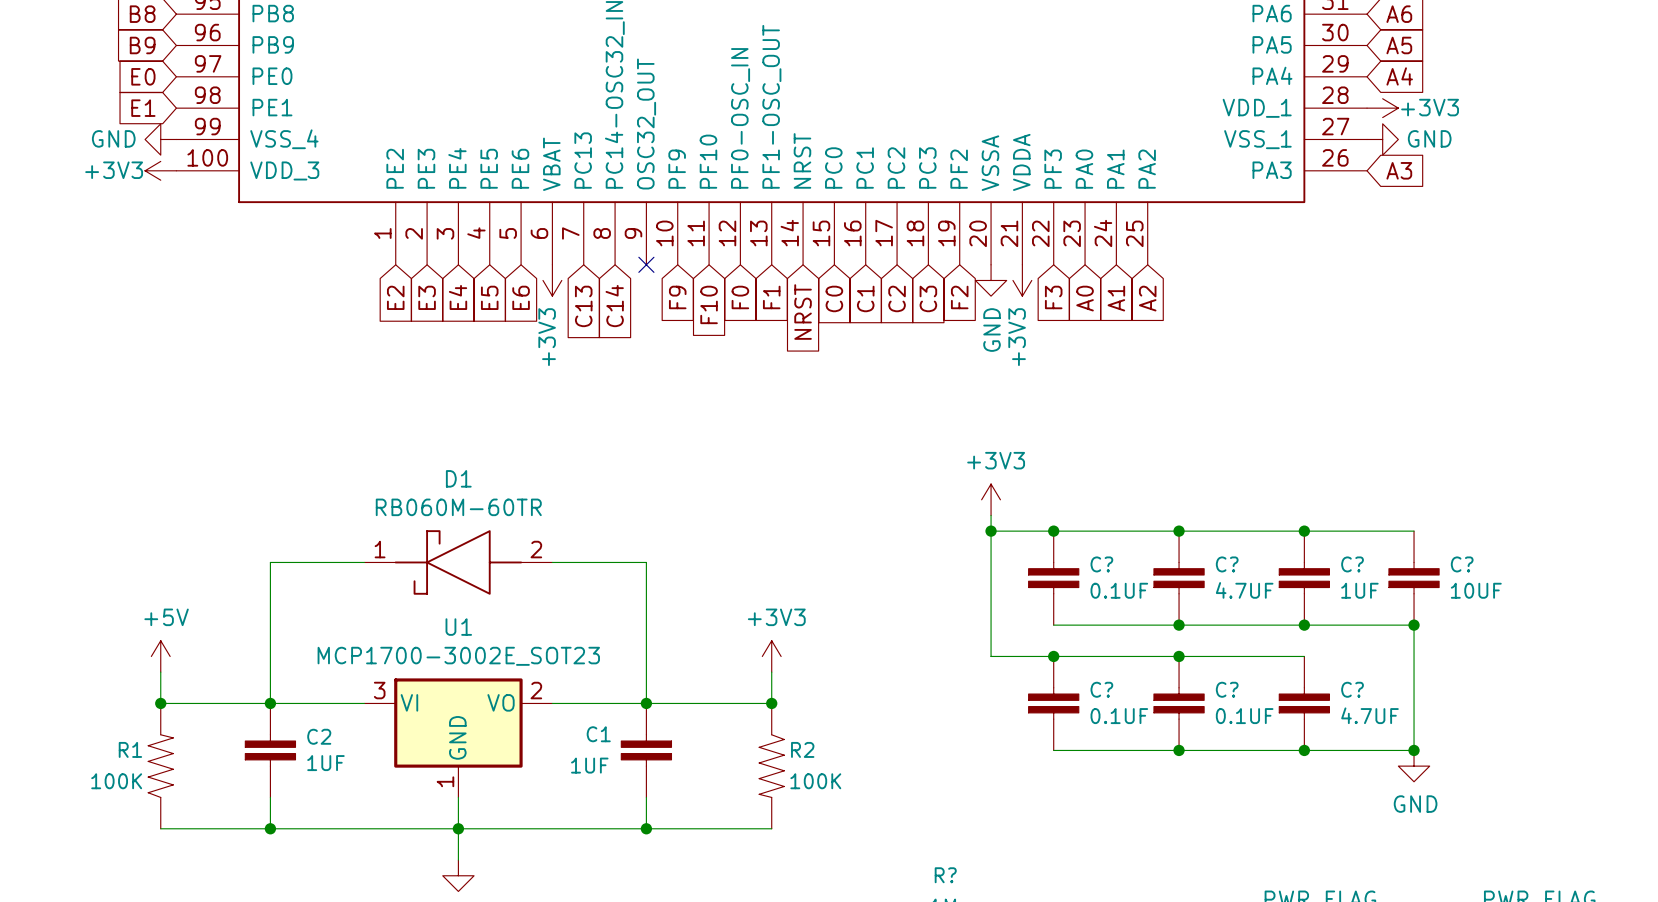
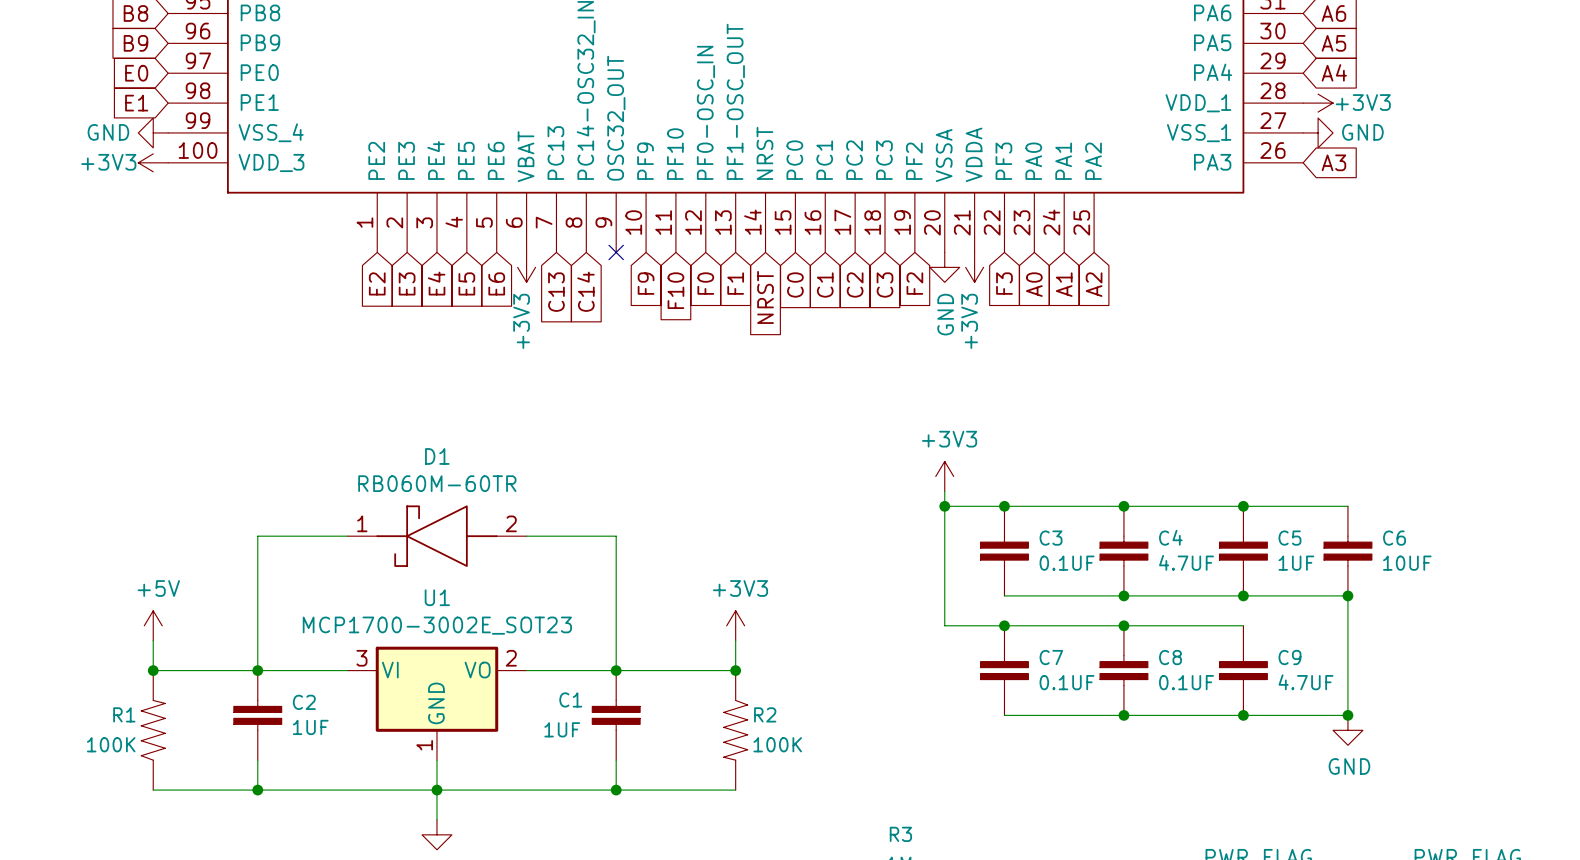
C? name: C? (1101, 564) -> C3 (1051, 538)
C? name: C? (1227, 564) -> C4 (1170, 537)
C? name: C? (1352, 564) -> C5 (1289, 538)
C? name: C? (1462, 564) -> C6 (1394, 538)
C? name: C? (1101, 689) -> C7 (1051, 657)
C? name: C? (1227, 689) -> C8 (1170, 657)
C? name: C? (1352, 689) -> C9 (1289, 657)
R? name: R? (945, 875) -> R3 (900, 834)

